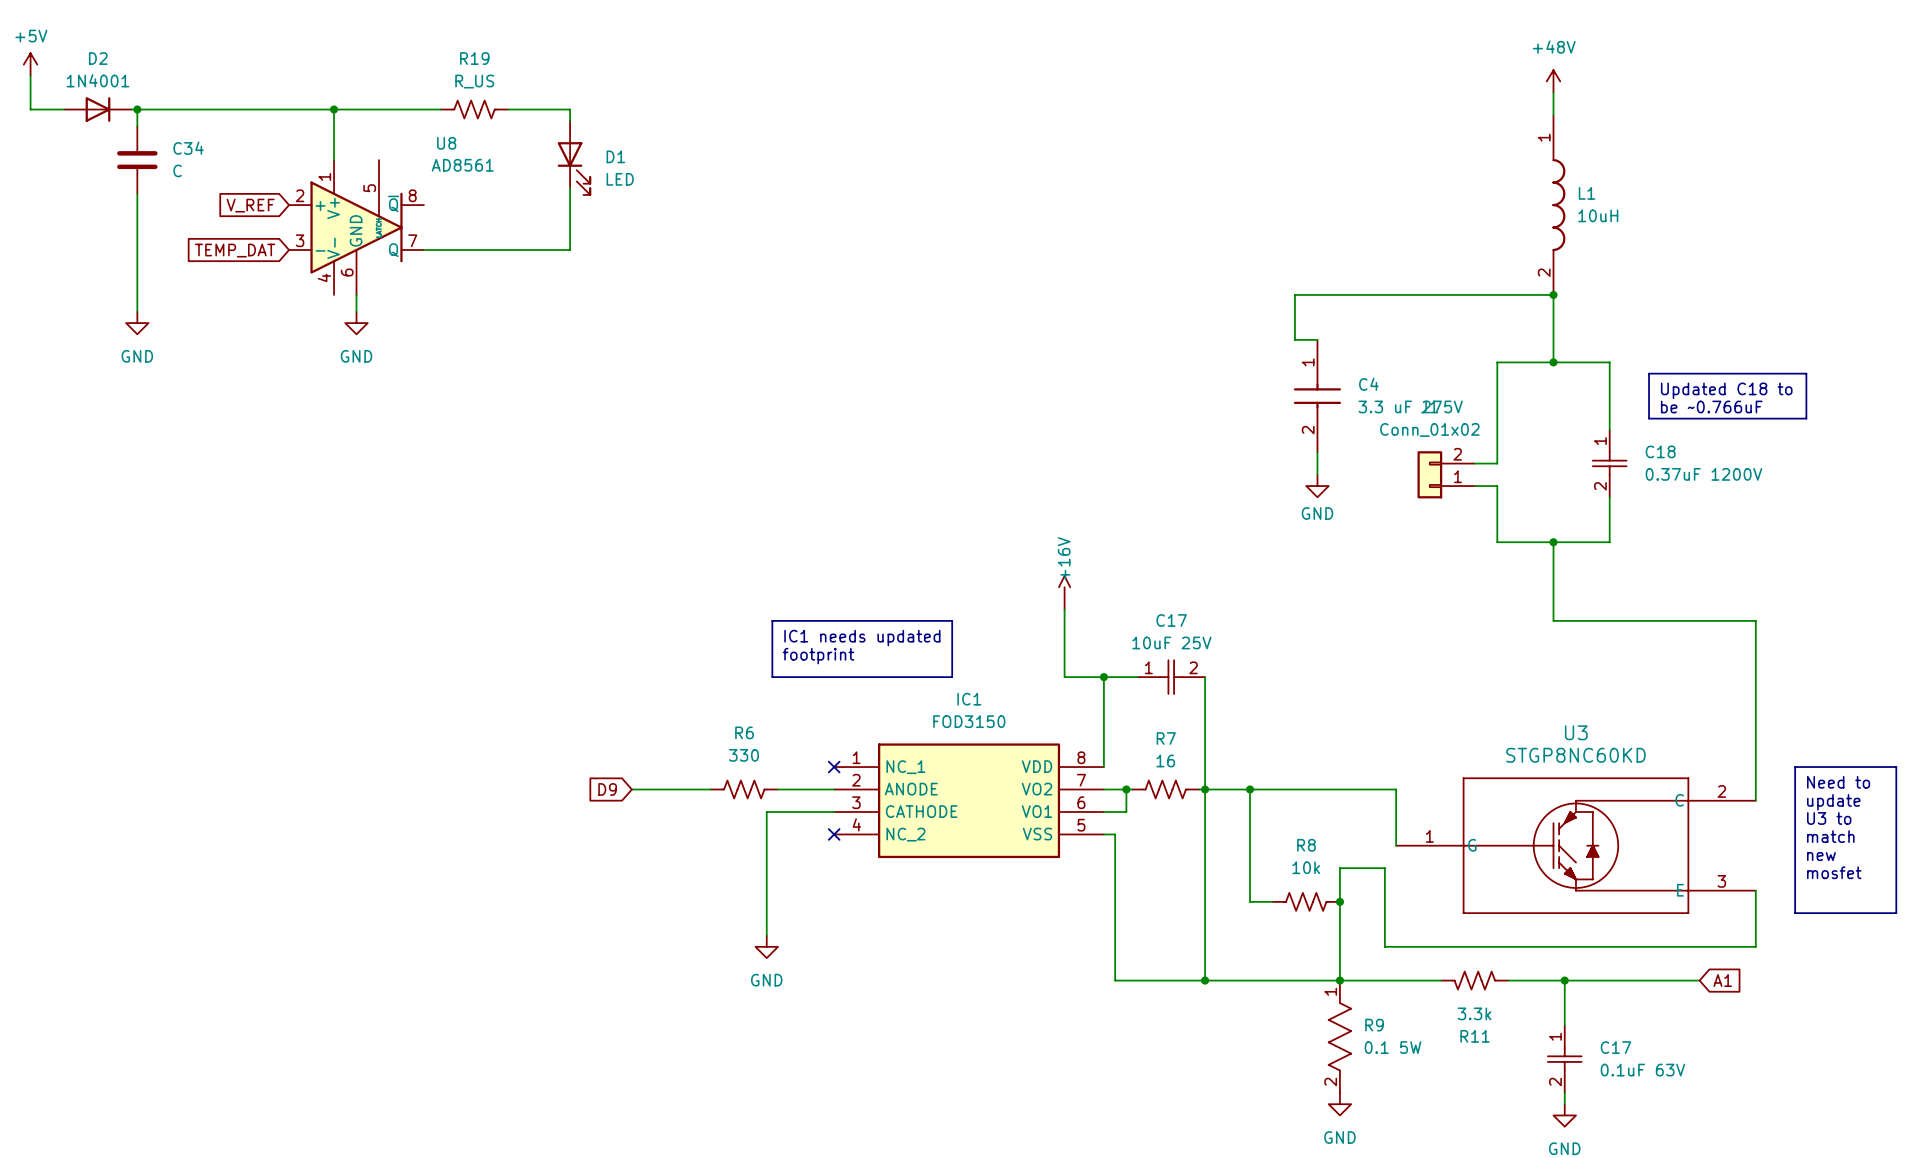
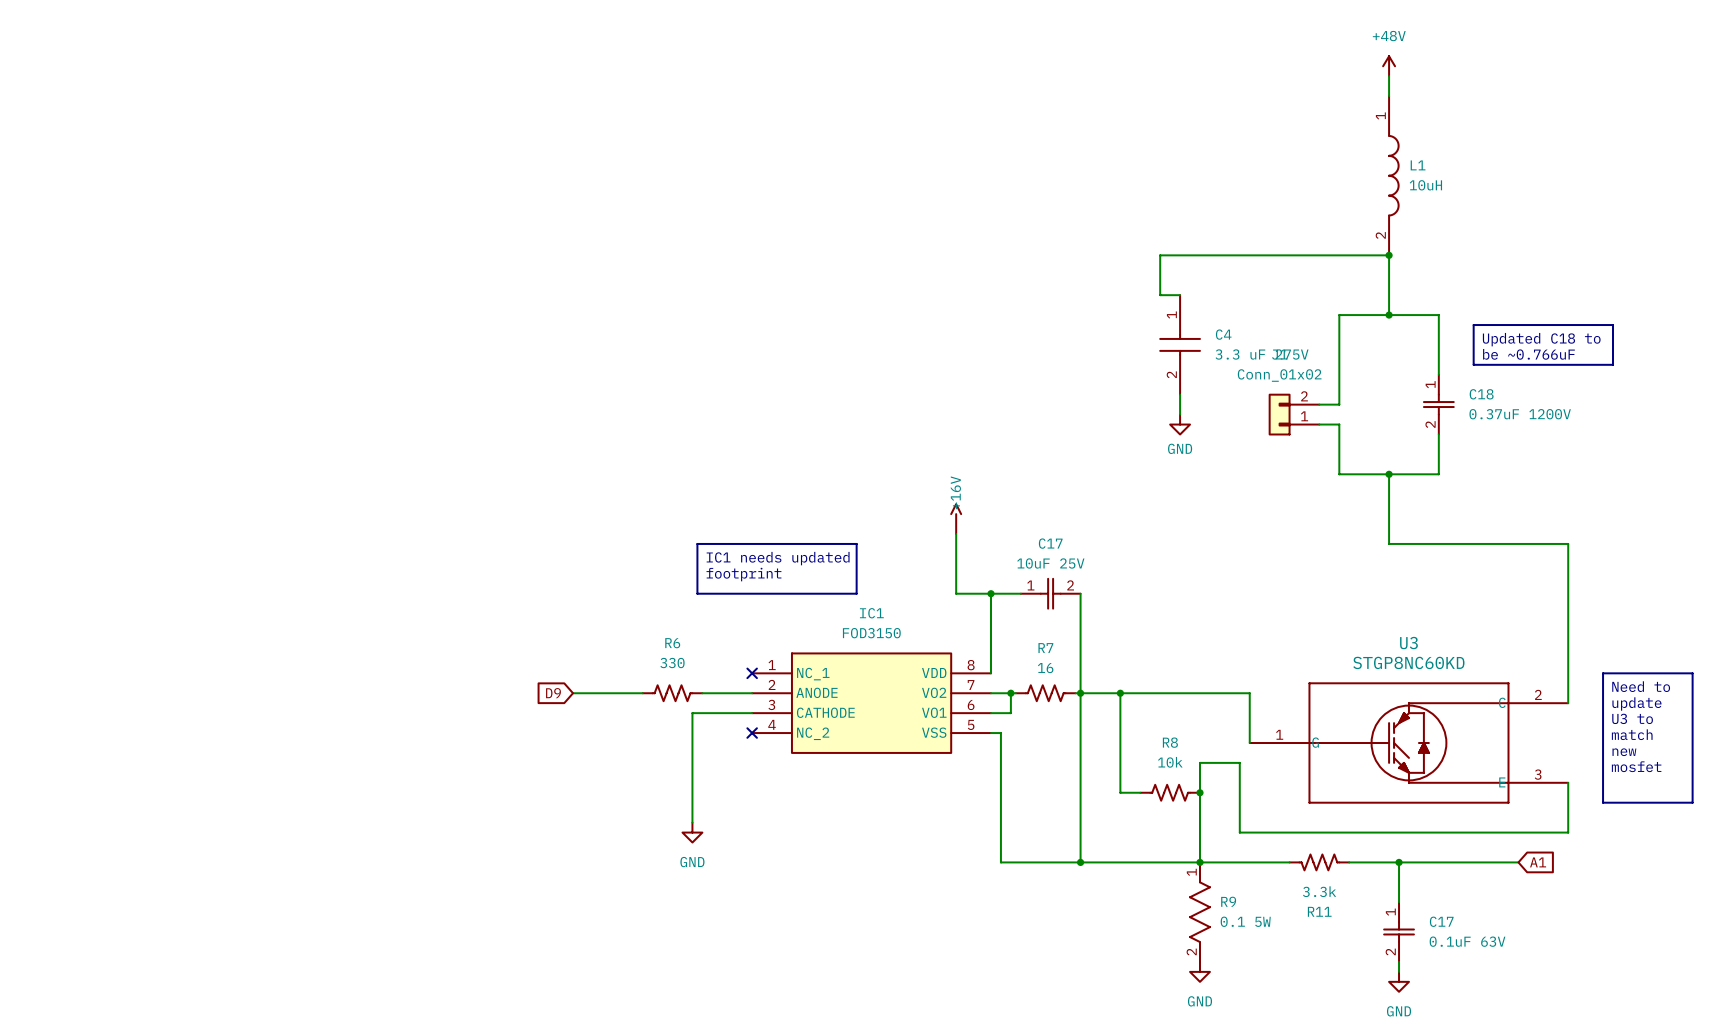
power symbol: +5V (30, 64) -> none
wire: (30, 75) (30, 109) (64, 109) -> none
D2: 1N4001 (98, 109) -> none
wire: (131, 109) (440, 109) -> none
wire: (137, 109) (137, 126) -> none
junction: (137, 109) -> none
wire: (334, 109) (334, 160) -> none
junction: (334, 109) -> none
R19: R_US (474, 109) -> none
wire: (508, 109) (570, 109) (570, 120) -> none
D1: LED (573, 157) -> none
C34: C (137, 160) -> none
wire: (570, 188) (570, 250) (423, 250) -> none
wire: (137, 193) (137, 311) -> none
global label: V_REF (250, 205) -> none
U8: AD8561 (356, 227) -> none
global label: TEMP_DAT (235, 250) -> none
wire: (356, 294) (356, 311) -> none
power symbol: GND (137, 323) -> none
power symbol: GND (356, 323) -> none

